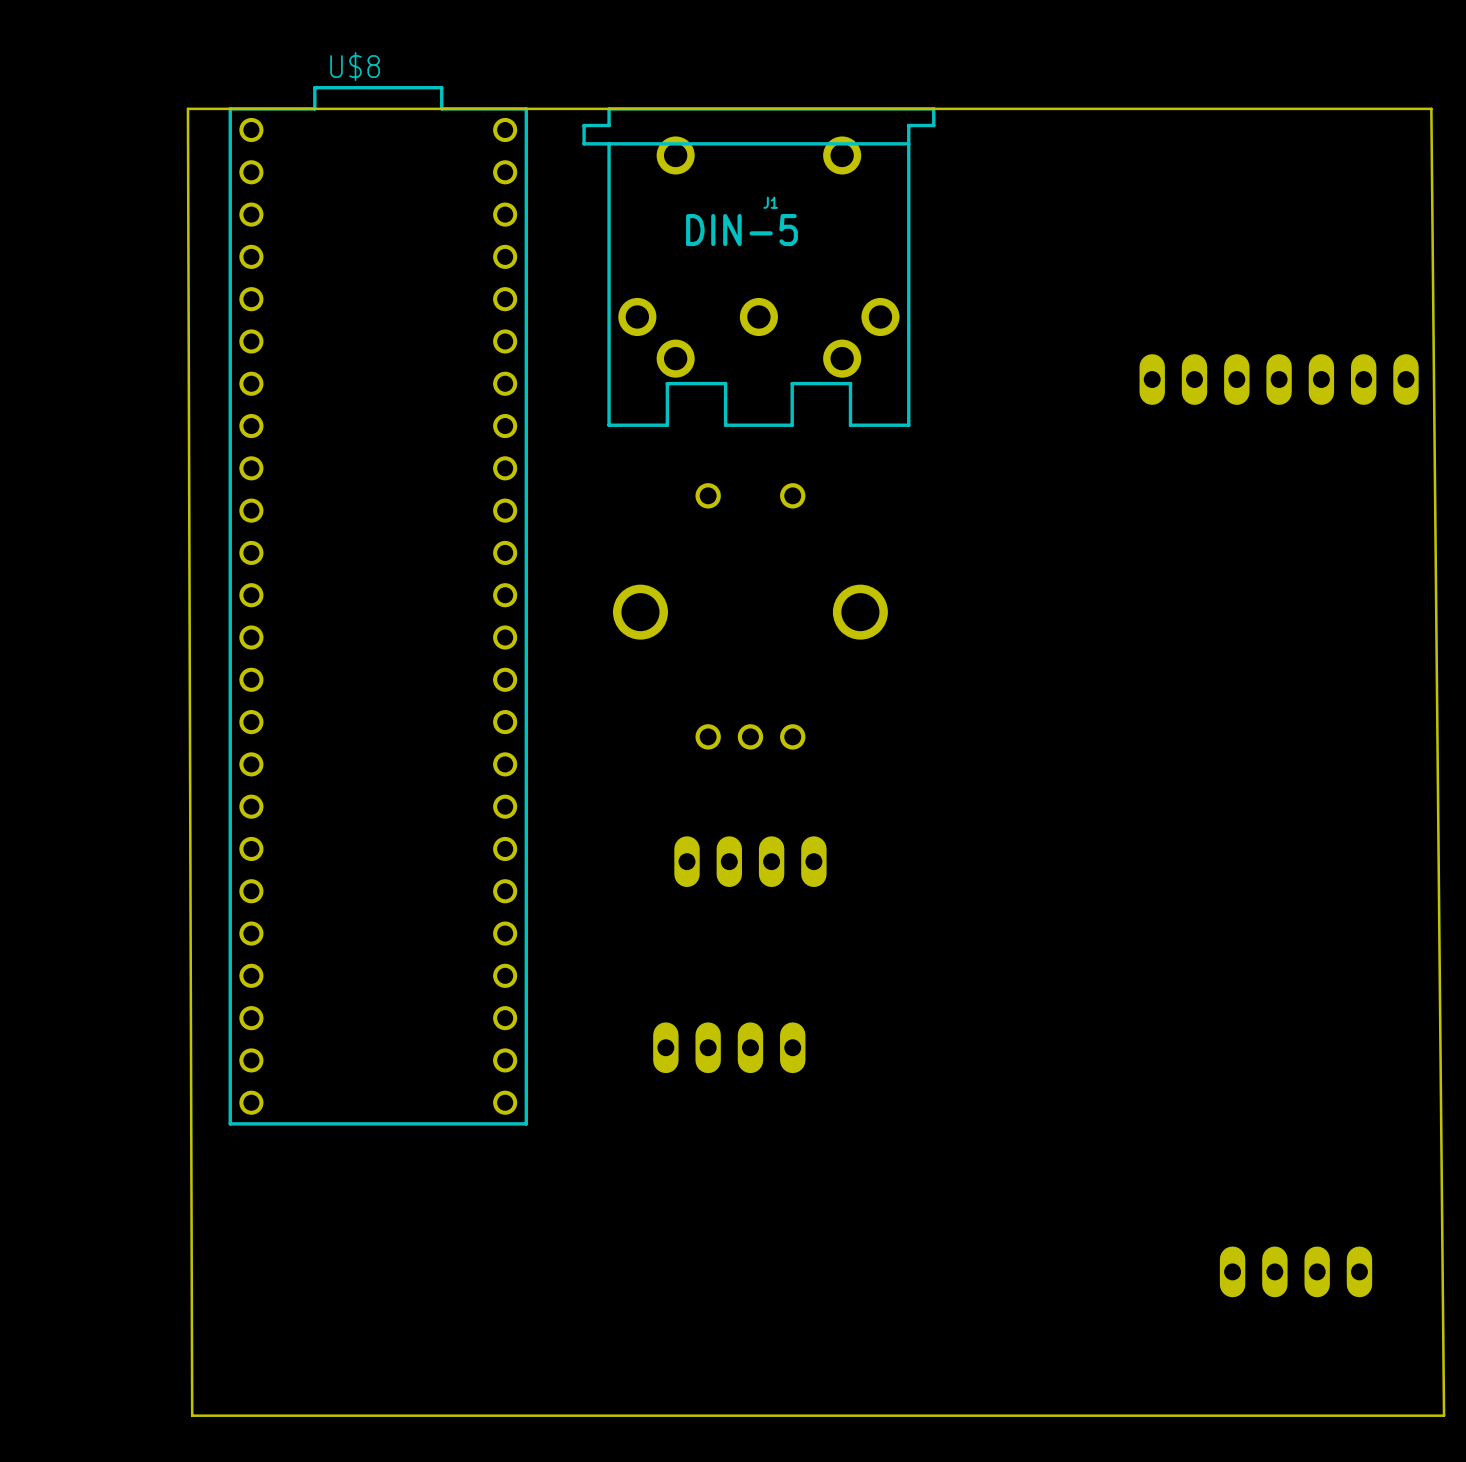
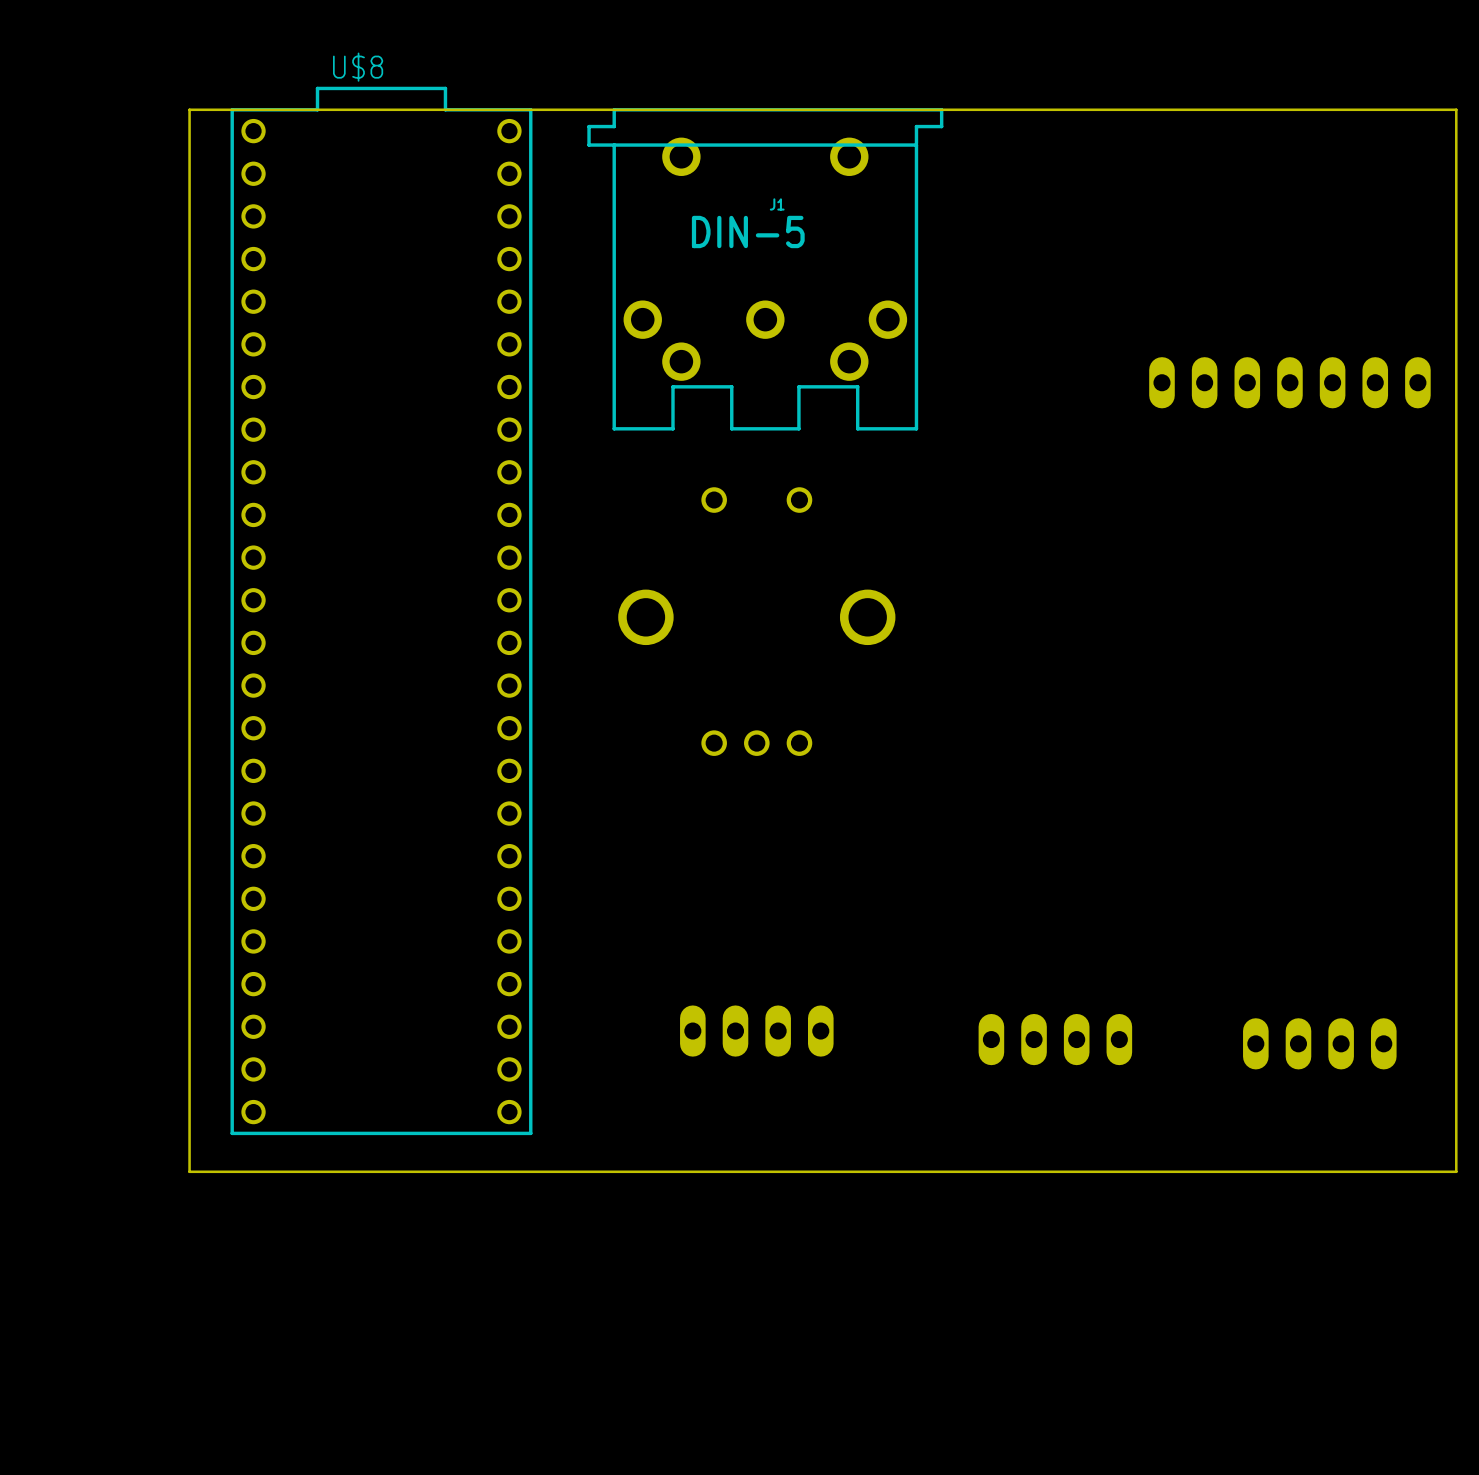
board edge: (1431, 108) (1444, 1415) (192, 1415) (187, 108) -> (1443, 109) (1456, 109) (1456, 1171) (189, 1171) (189, 109)
part: (750, 861) -> none
part: none -> (1055, 1039)
part: none -> (1319, 1043)
part position: (729, 1047) -> (756, 1031)
part: (1296, 1271) -> none

